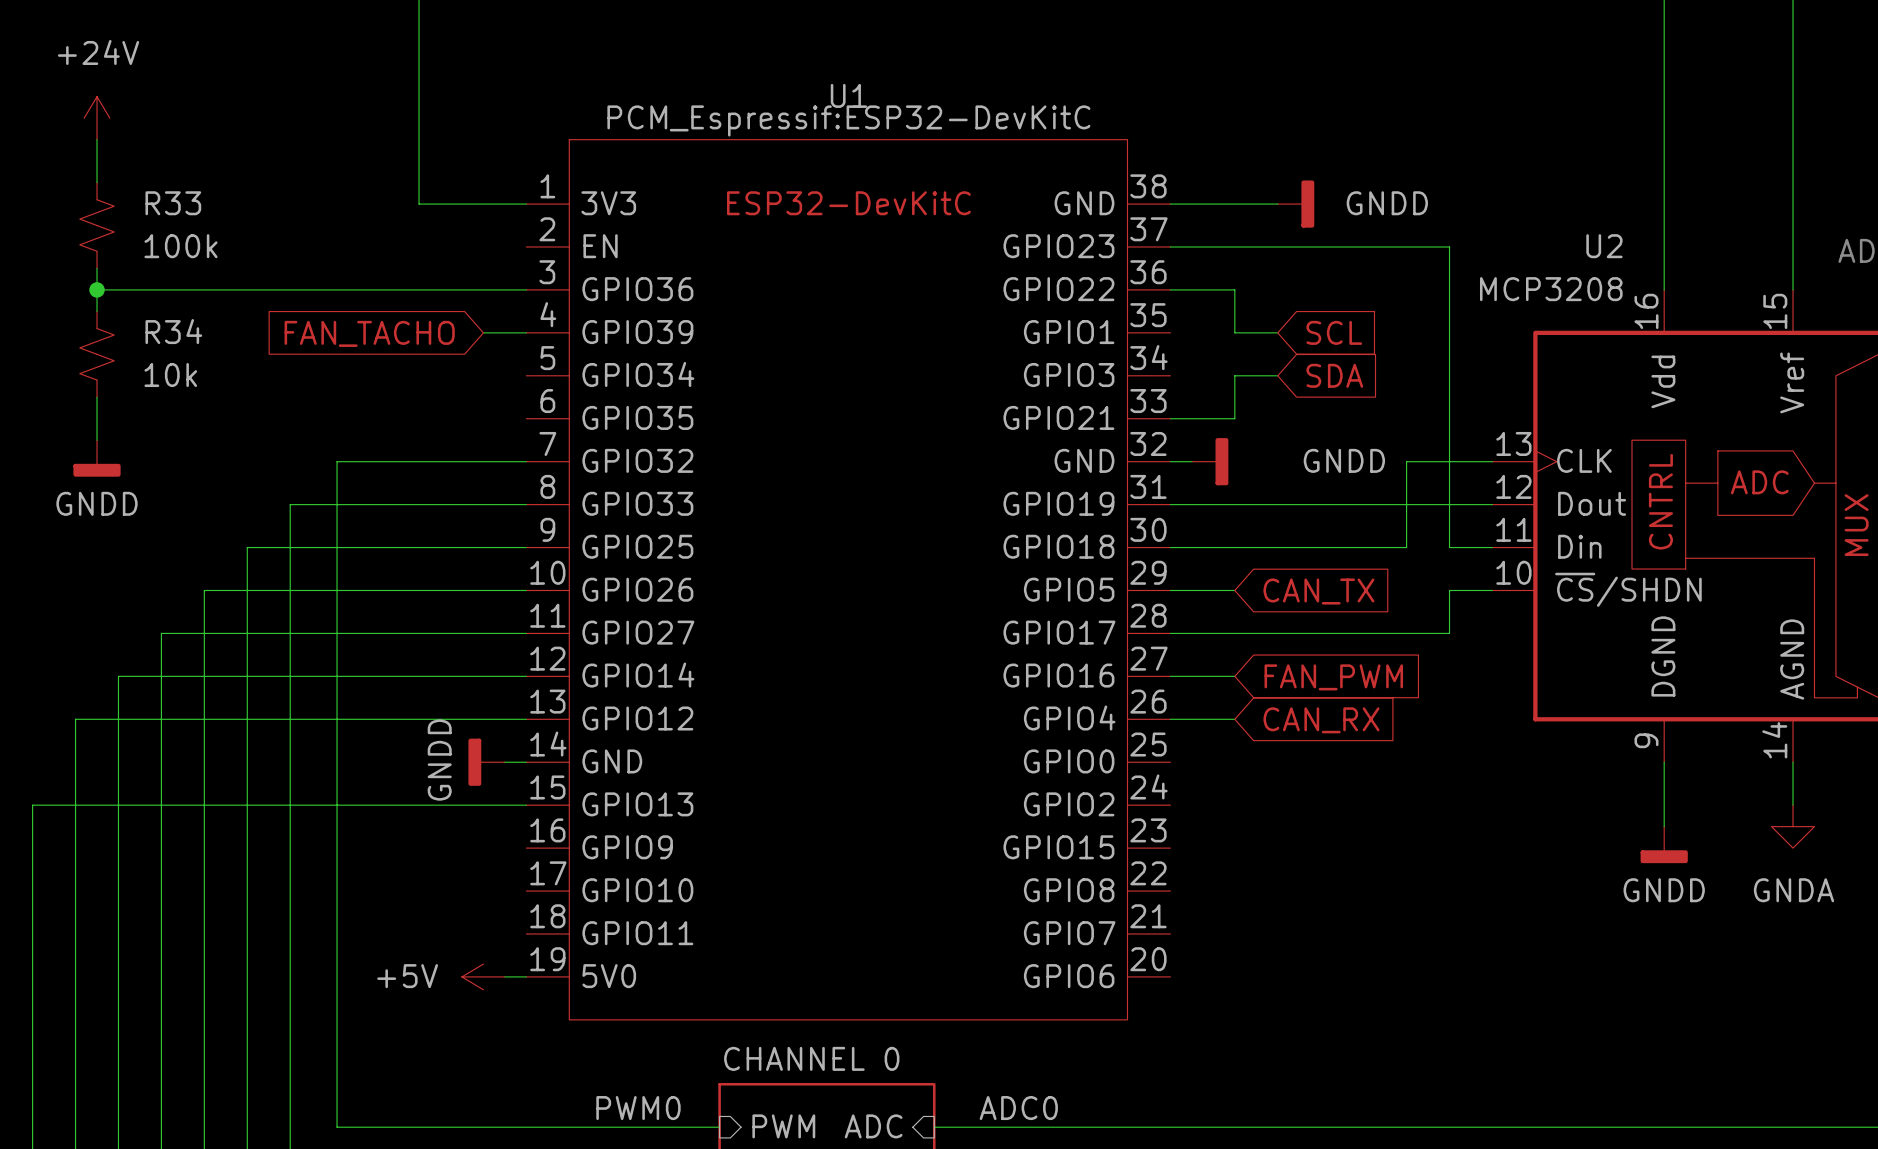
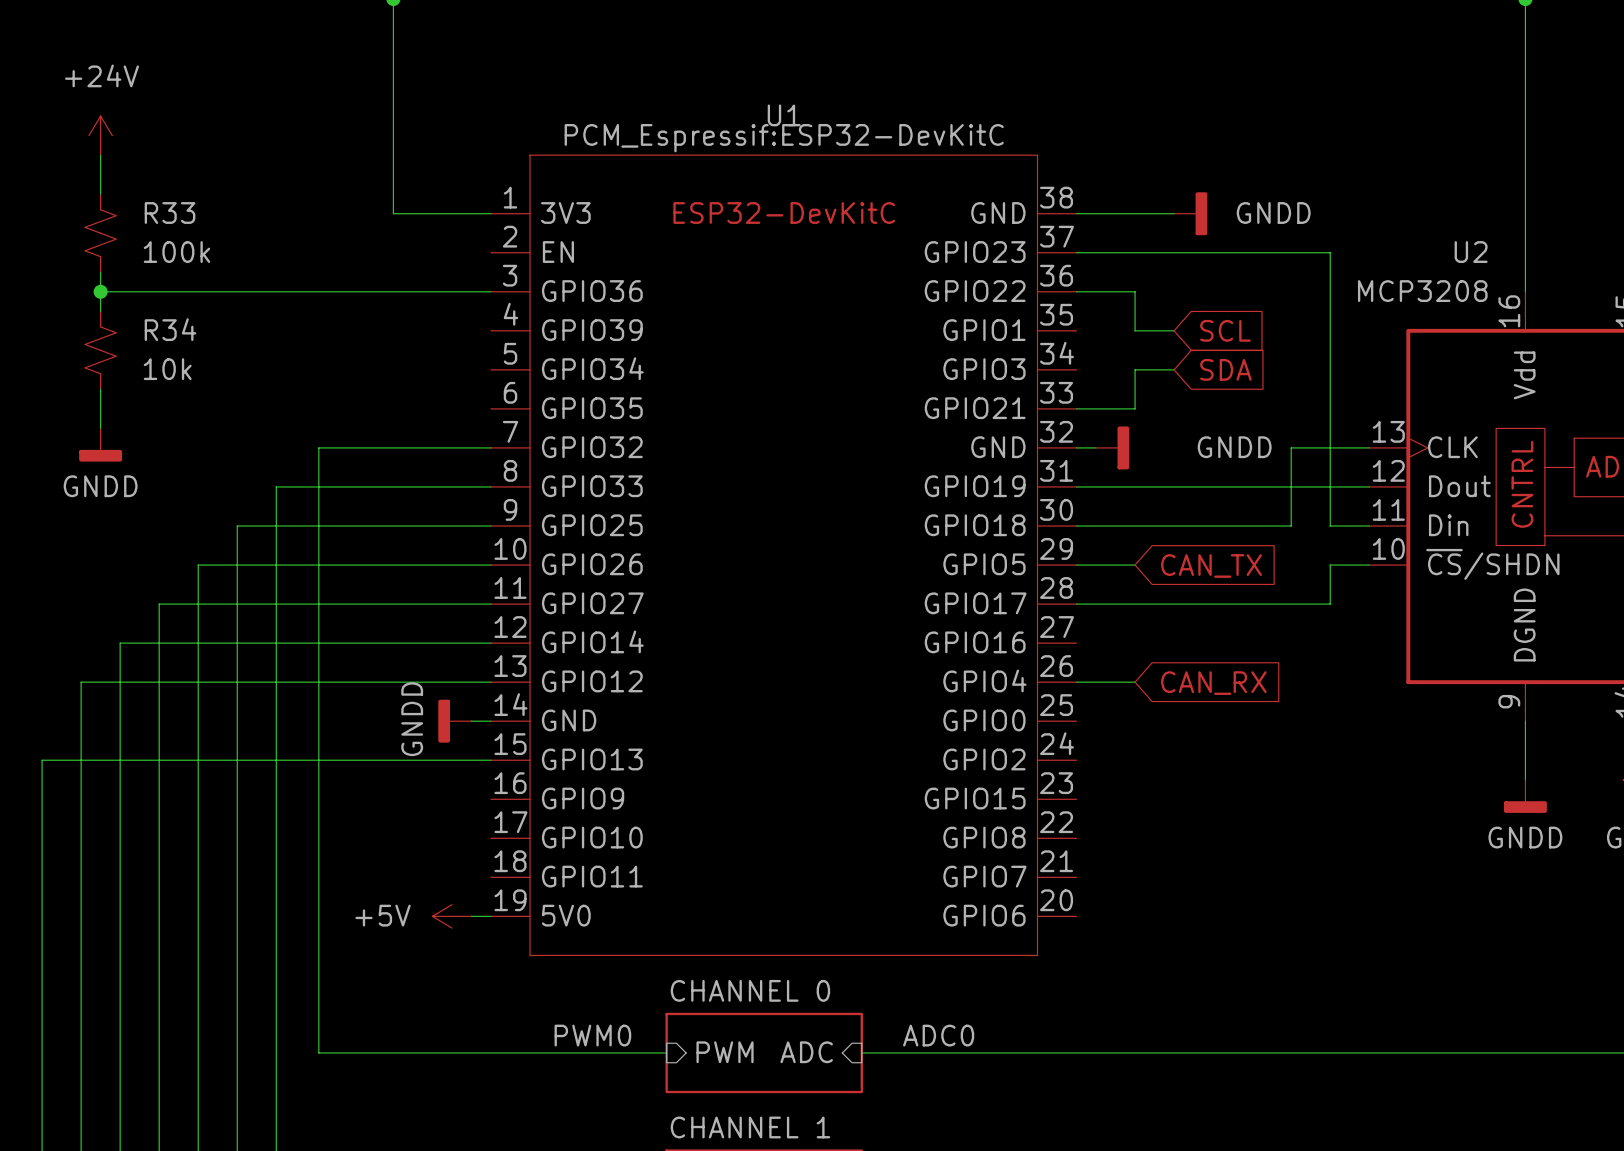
wire: (483, 332) (526, 332) -> none
global label: FAN_TACHO (369, 333) -> none
wire: (1170, 676) (1234, 676) -> none
global label: FAN_PWM (1333, 677) -> none

